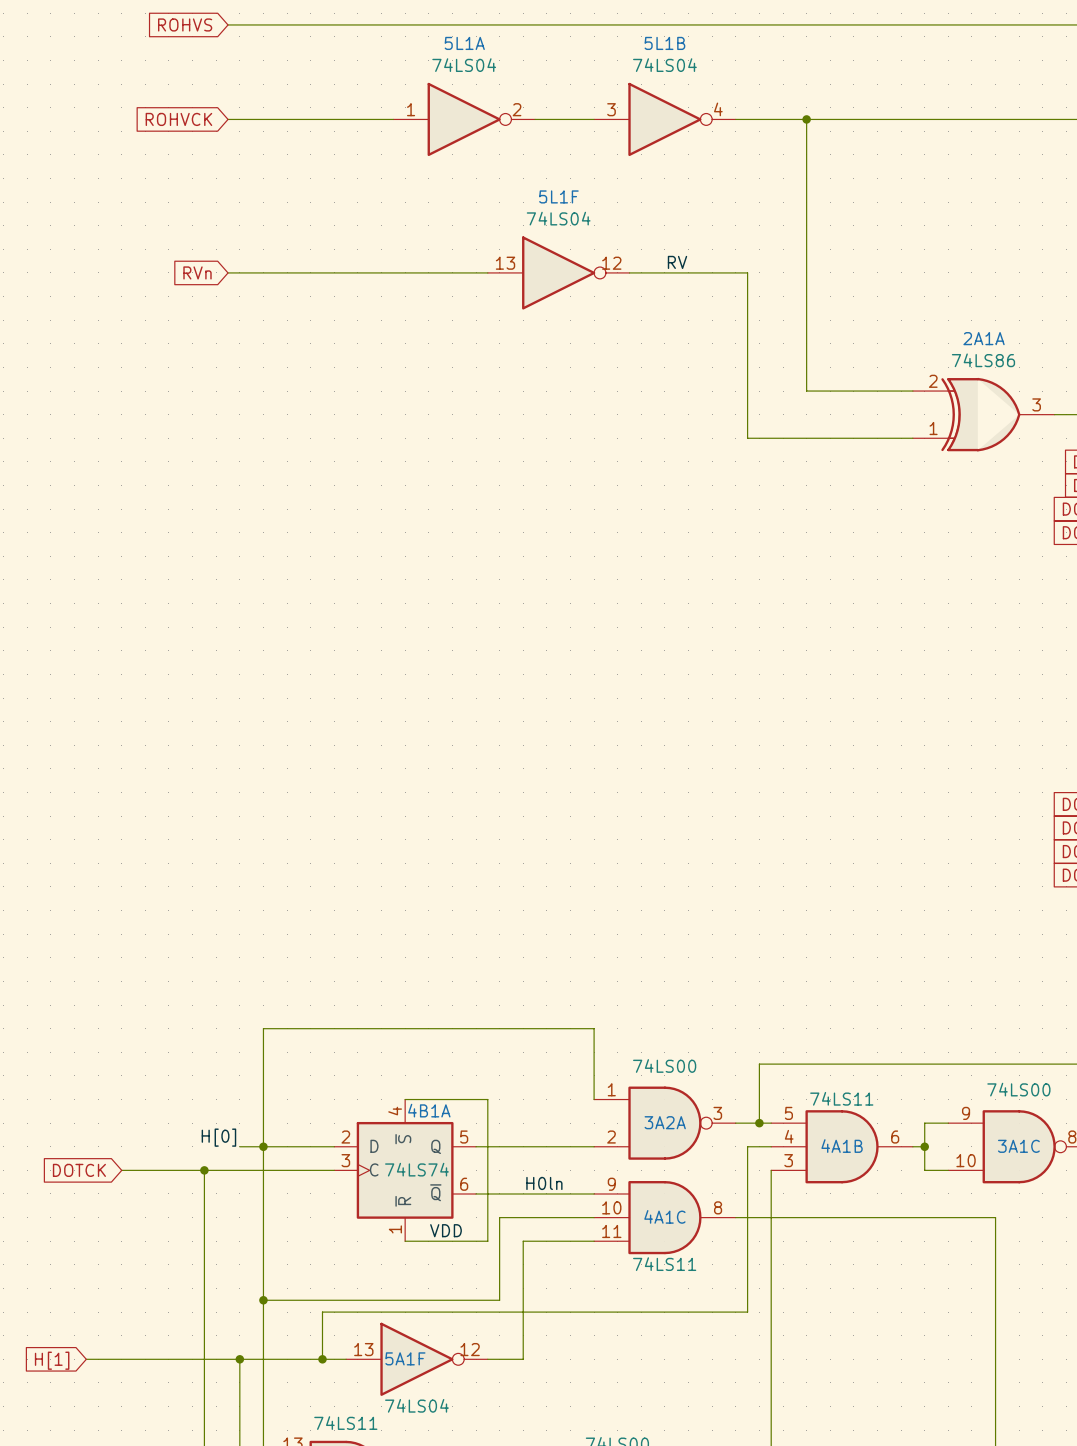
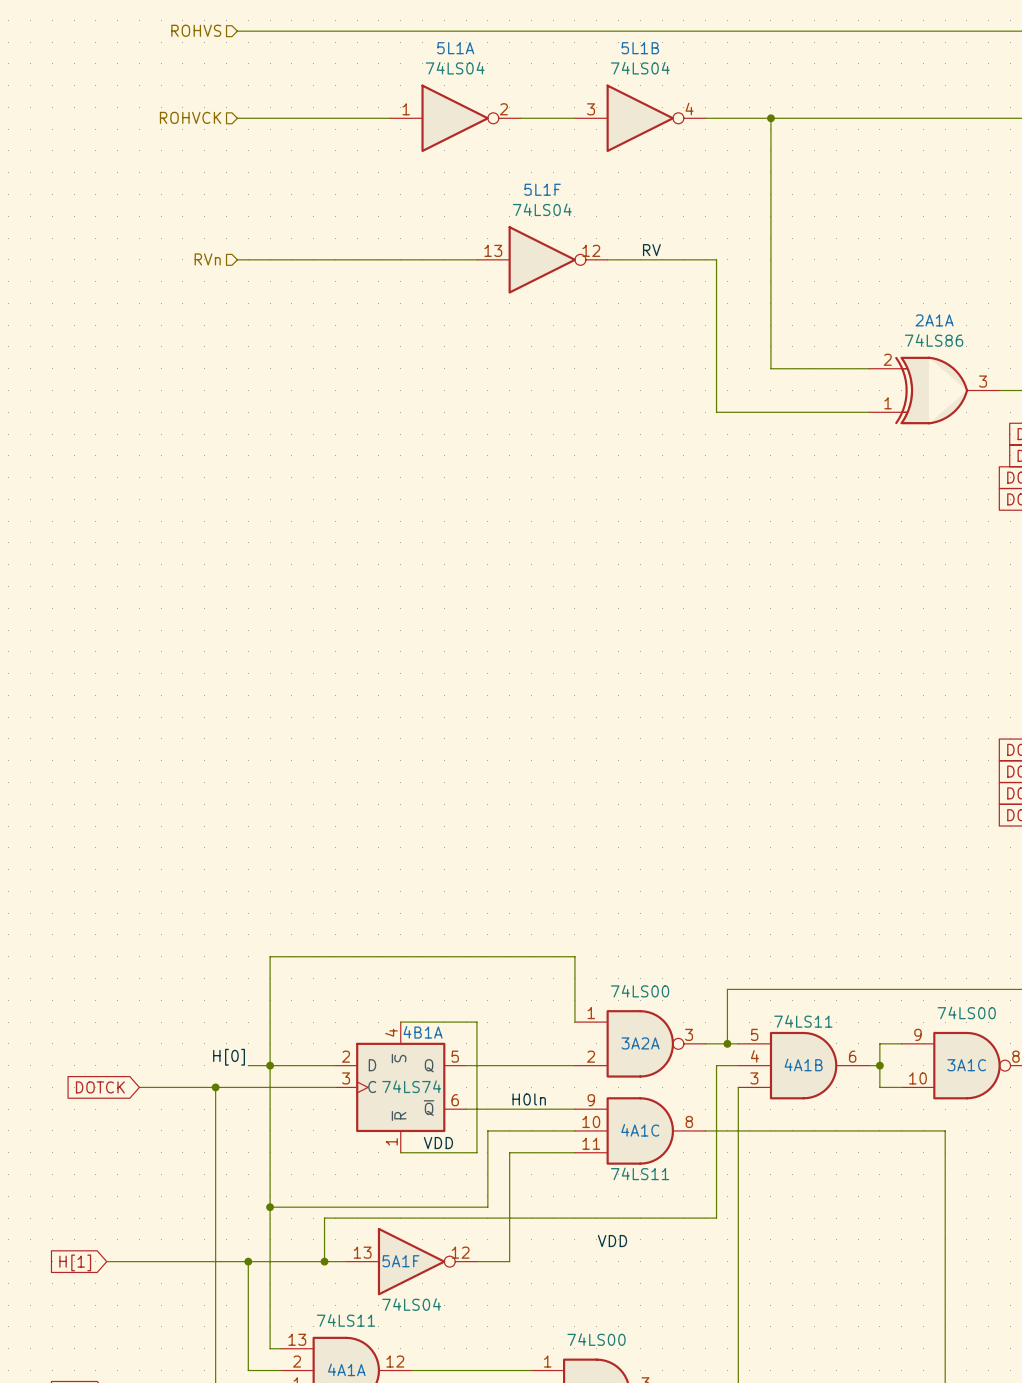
hierarchical label: none -> ROHVS (196, 30)
global label: ROHVS (185, 24) -> none
hierarchical label: none -> ROHVCK (190, 117)
global label: ROHVCK (178, 119) -> none
hierarchical label: none -> RVn (207, 259)
global label: RVn (197, 272) -> none
label: none -> VDD (612, 1241)

